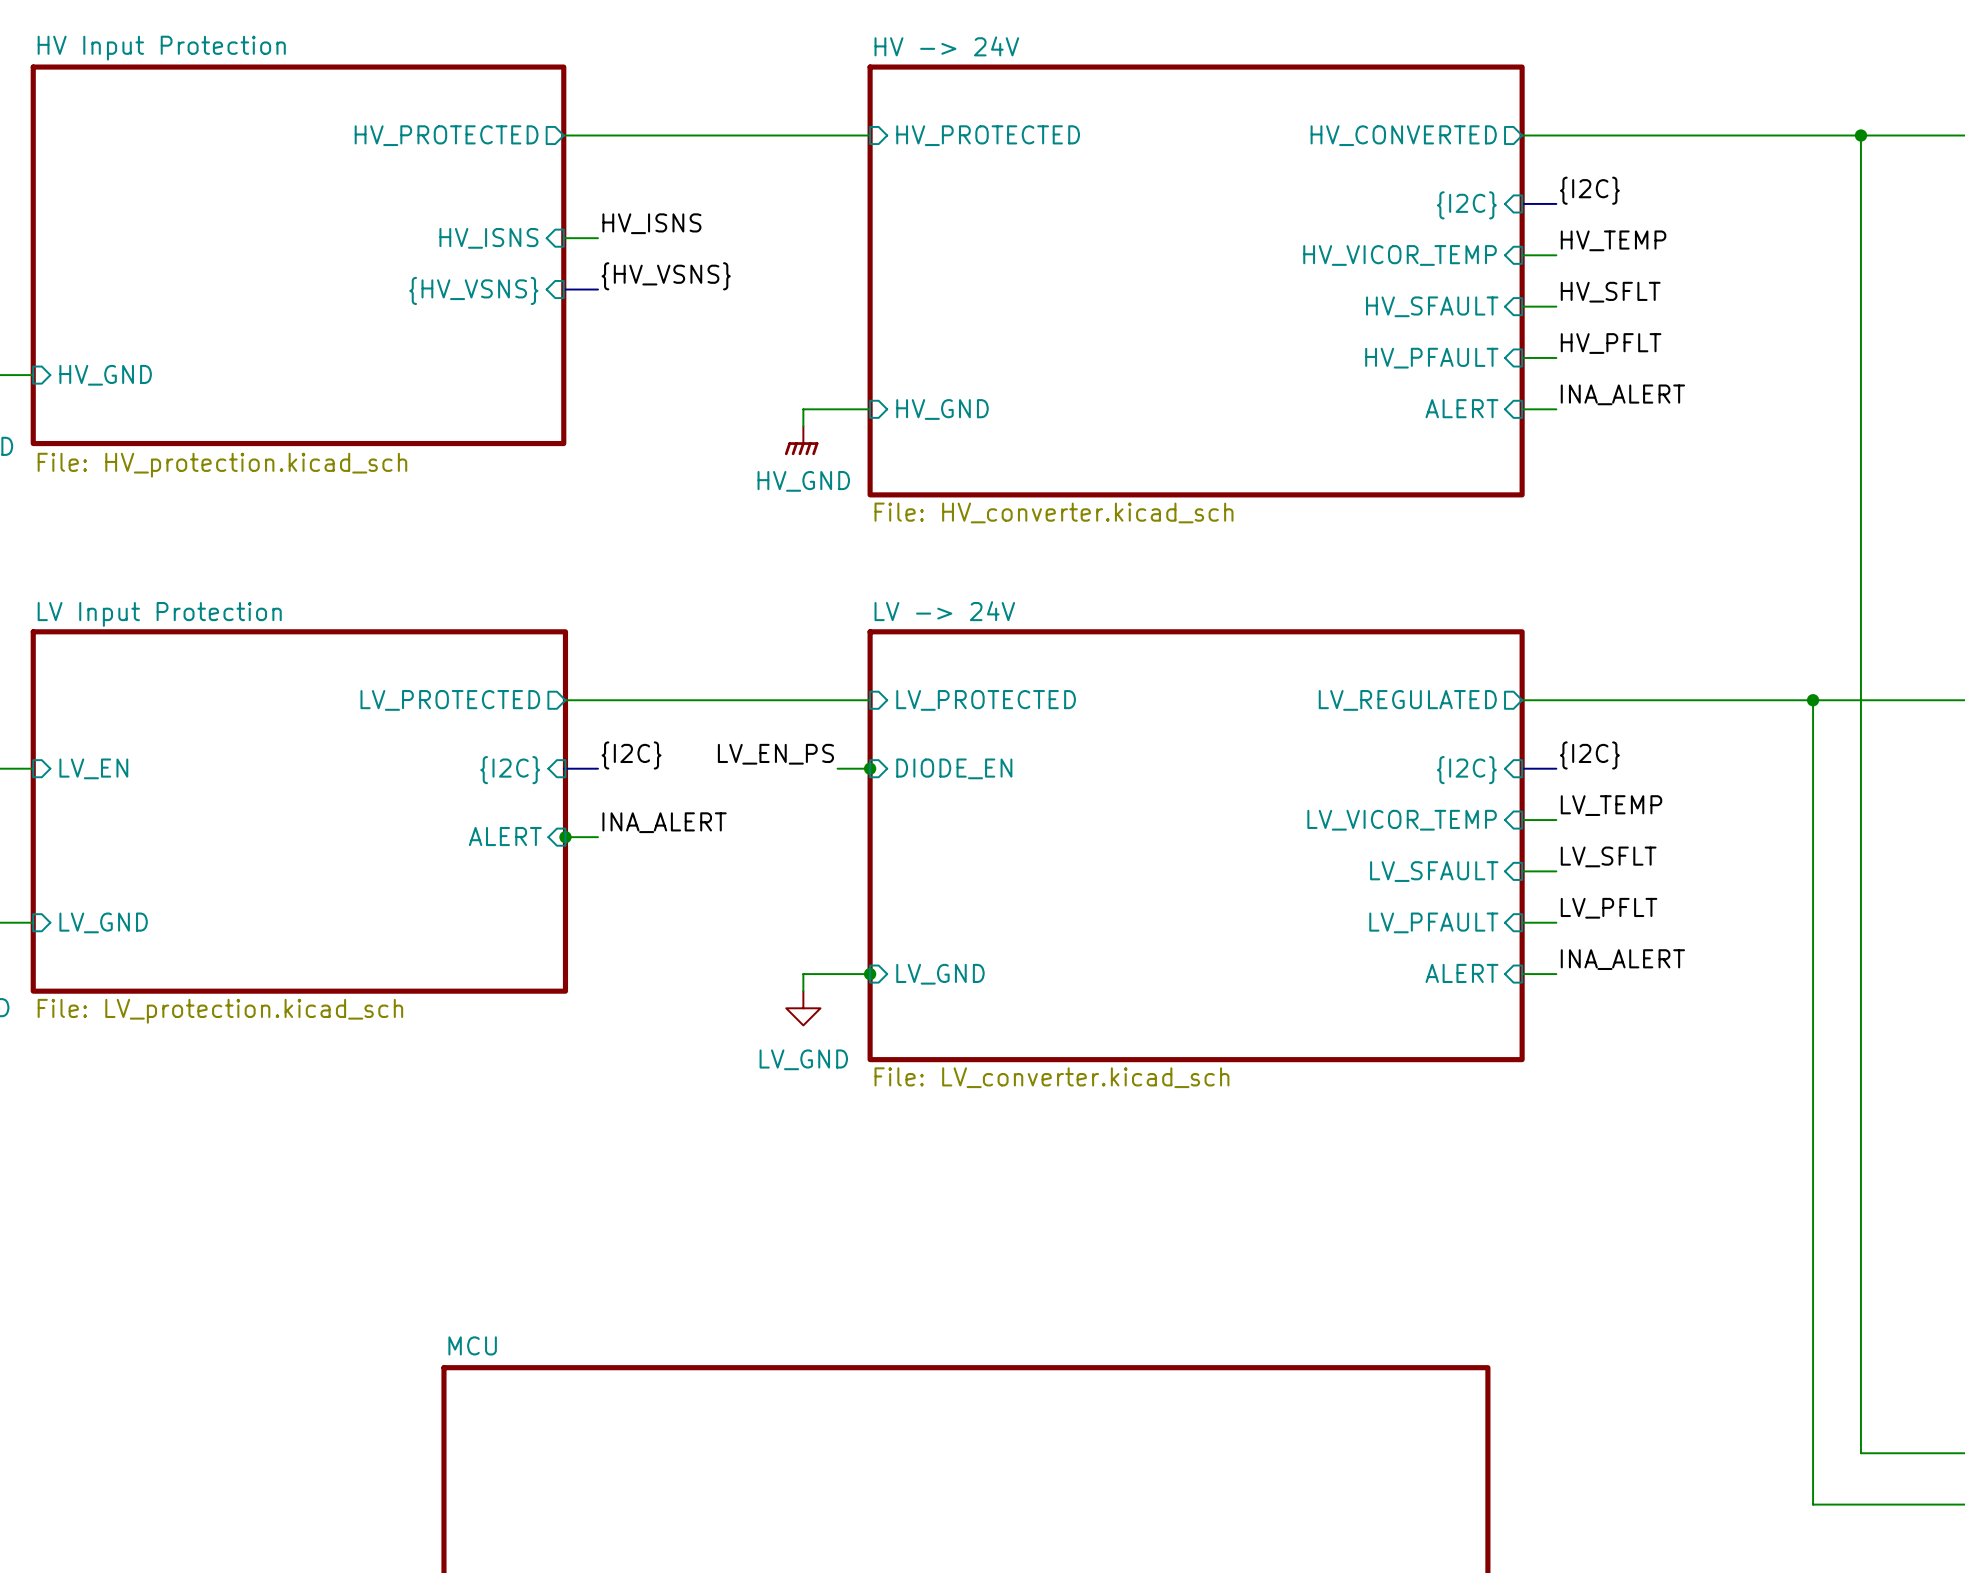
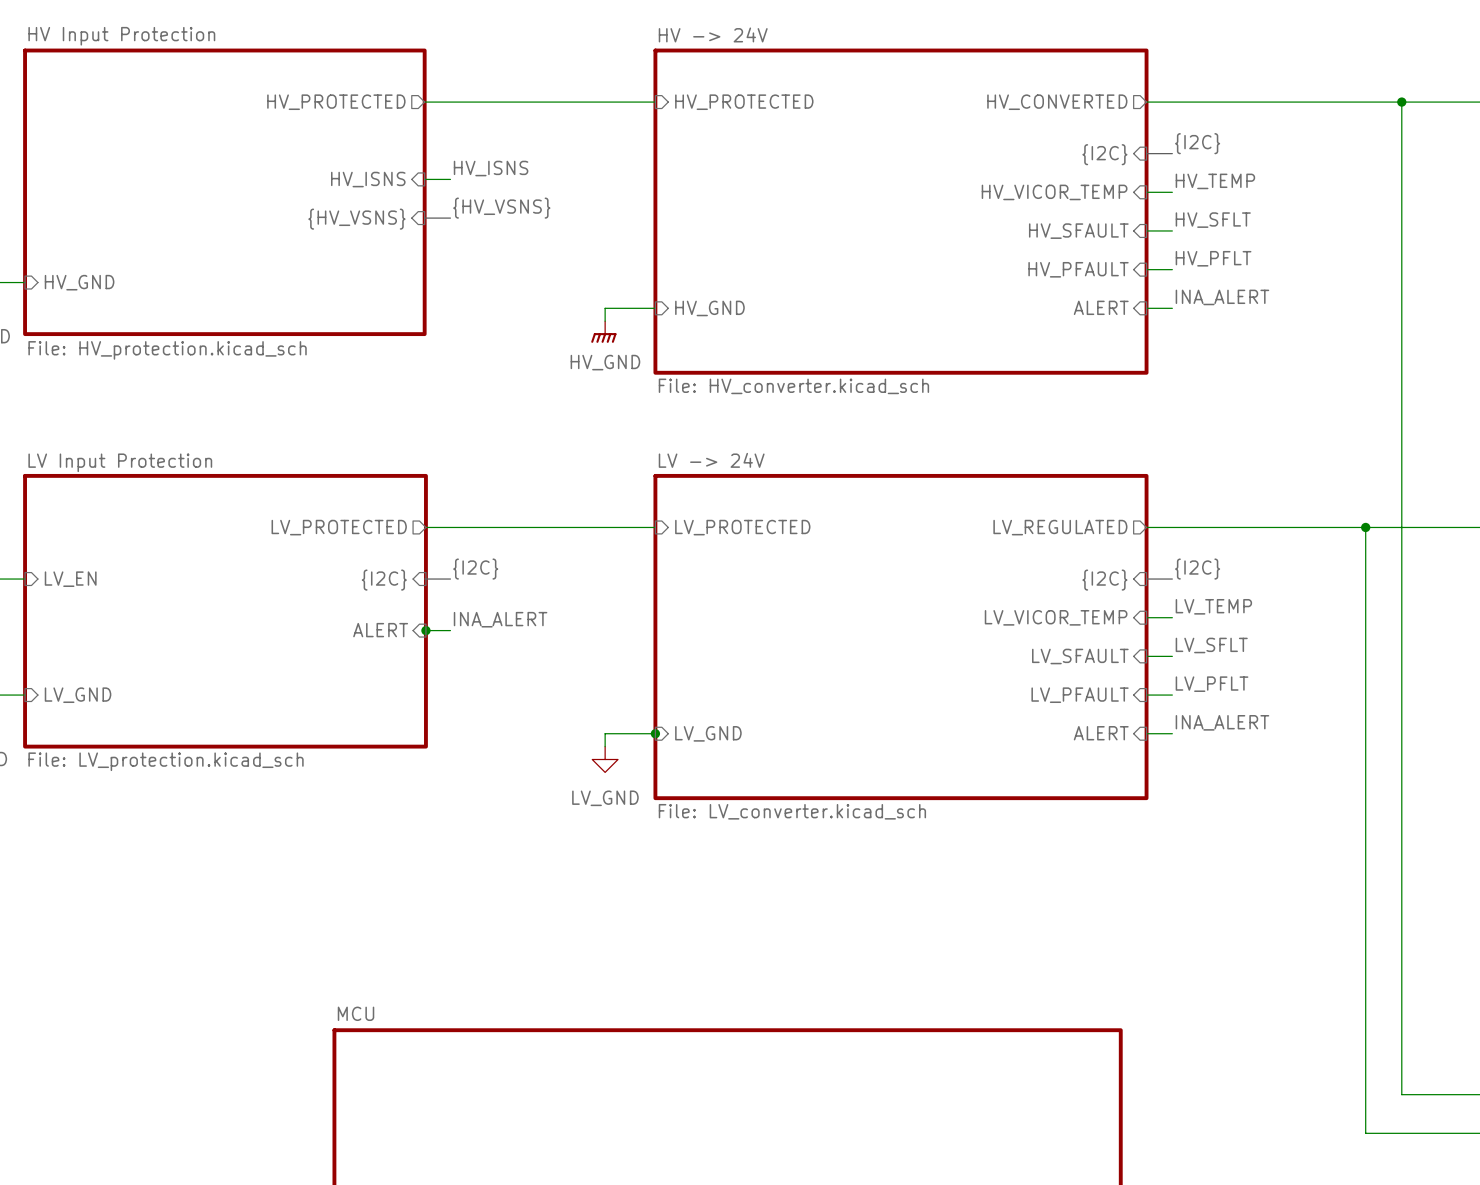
label: LV_EN_PS (775, 754) -> none
wire: (837, 768) (871, 768) -> none
junction: (870, 768) -> none
sheet pin: DIODE_EN (954, 768) -> none

